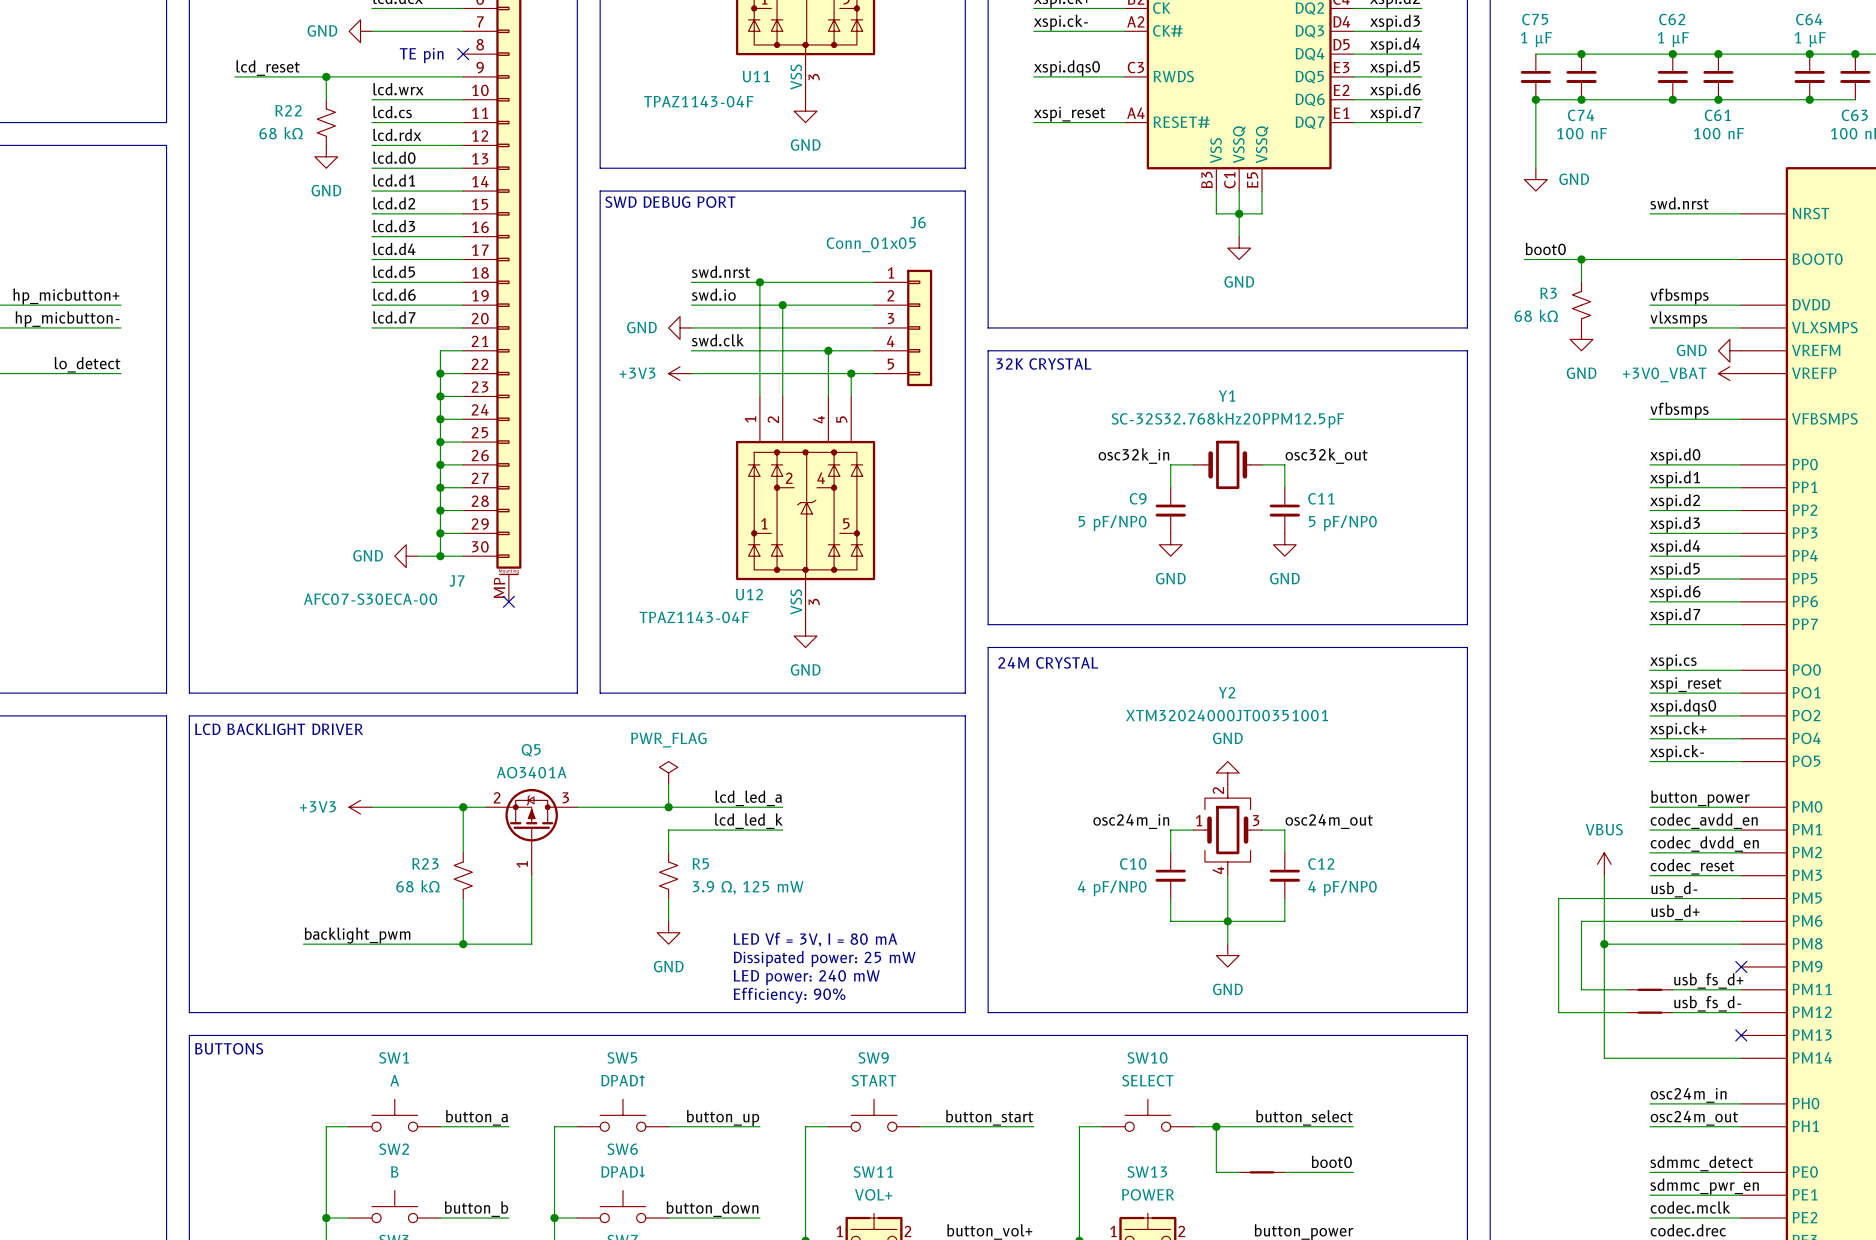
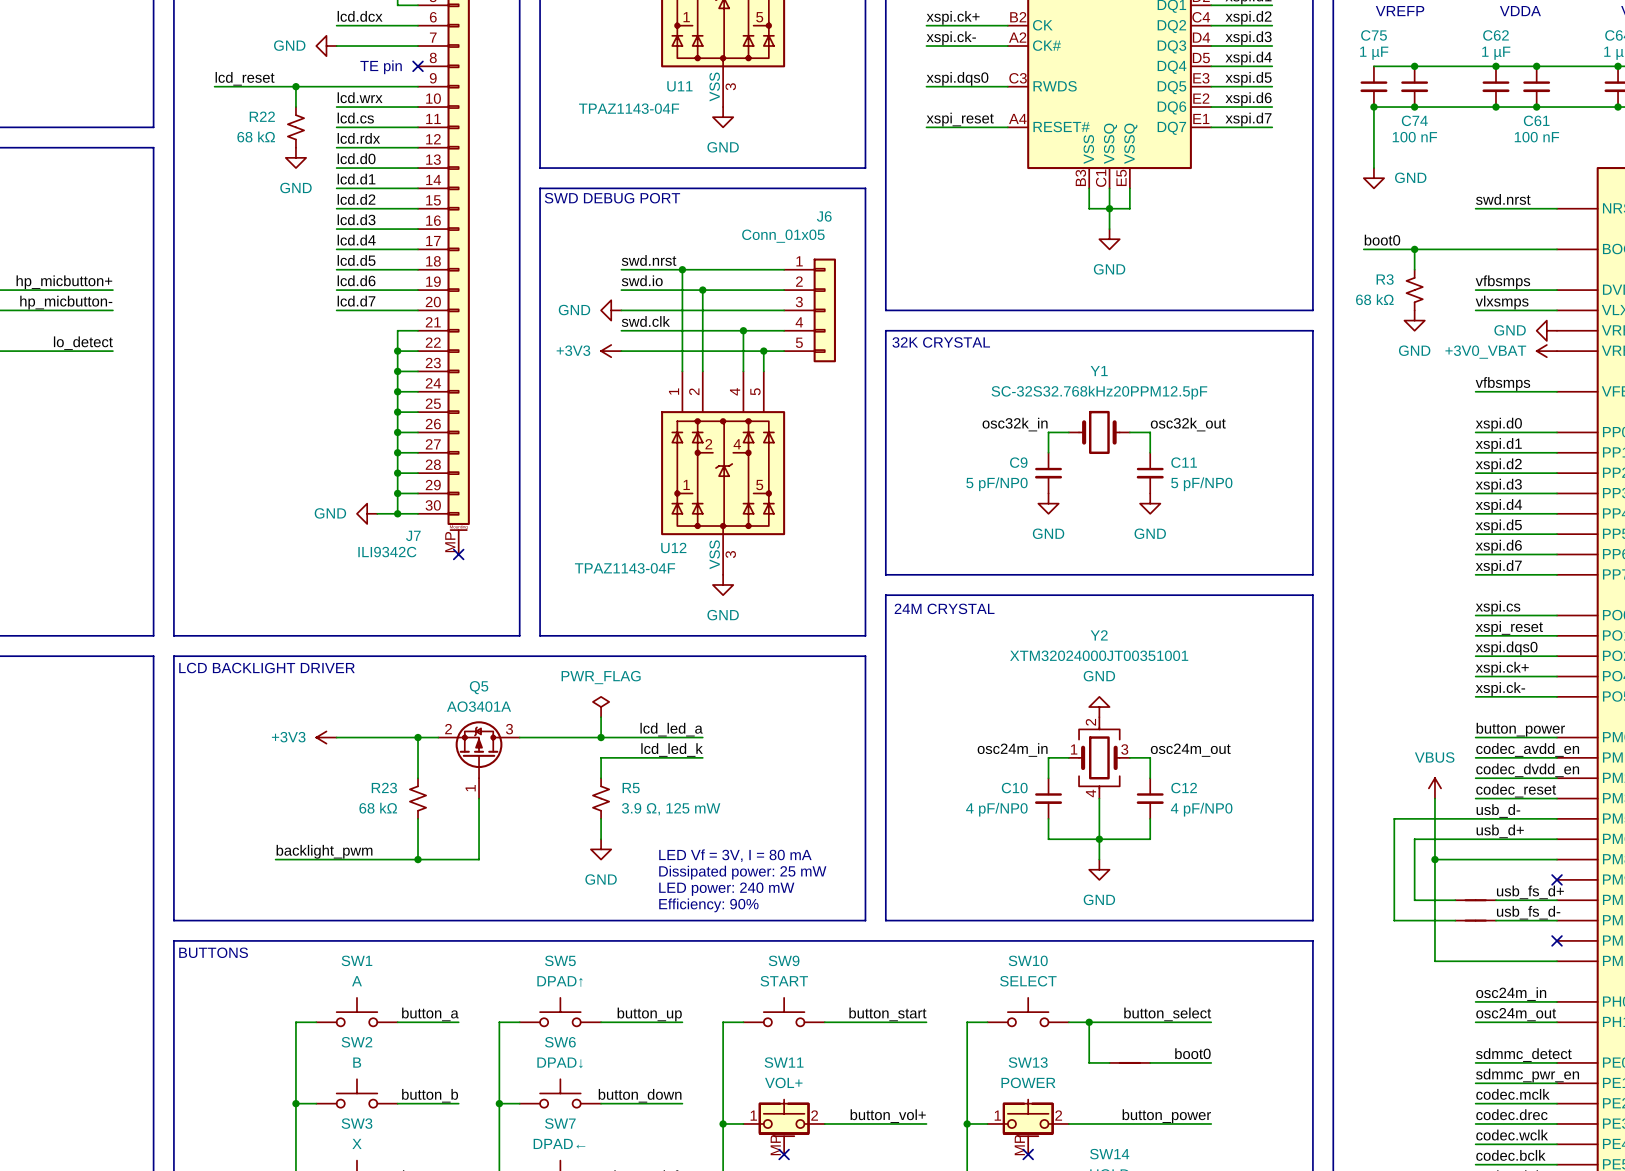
J7 value: AFC07-S30ECA-00 (370, 599) -> ILI9342C (387, 552)

